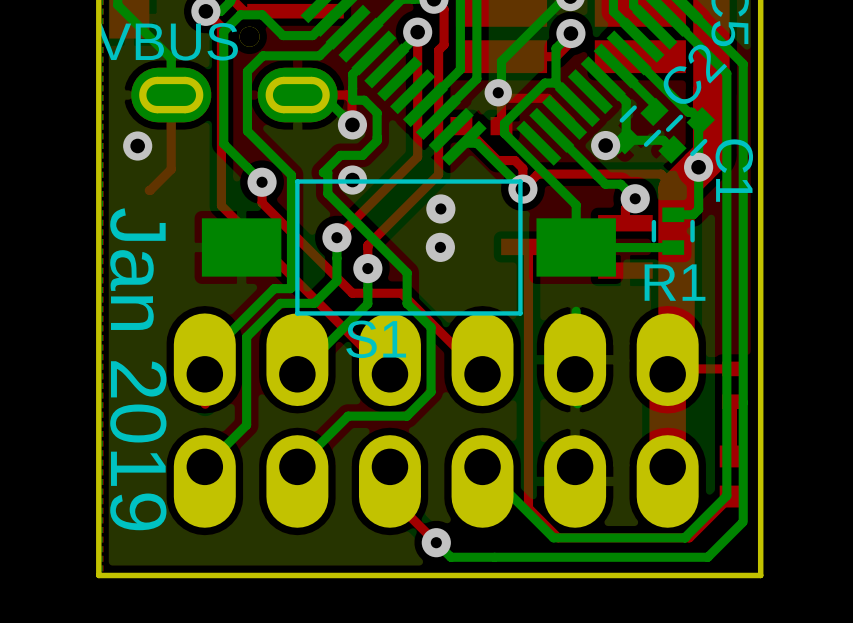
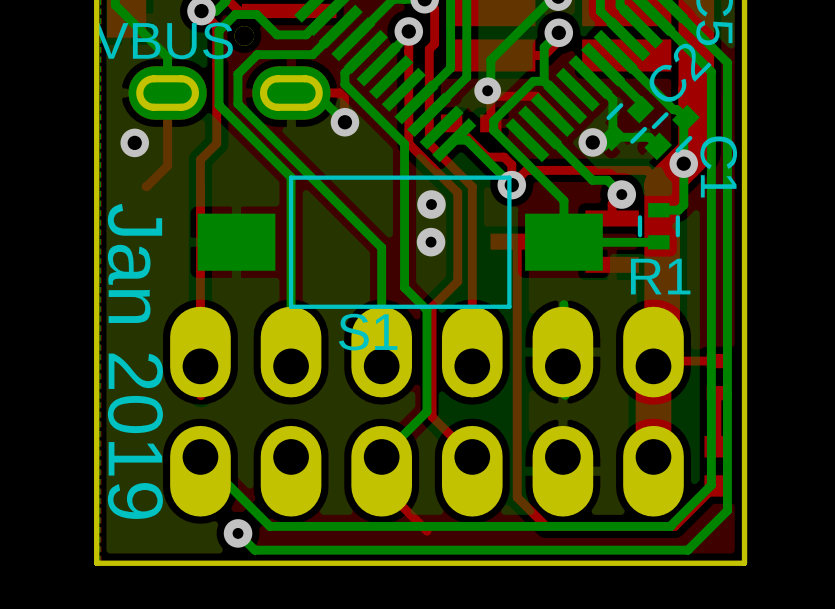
bottom track: (247, 71) (247, 131) (291, 175) (291, 287) (274, 288) (204, 358) (204, 374) -> (242, 69) (237, 74) (237, 103) (381, 247) (381, 366)
bottom track: (352, 74) (352, 100) (364, 100) (377, 113) (377, 140) (362, 155) (340, 155) (323, 172) (327, 172) (327, 193) (407, 272) (407, 303) -> (344, 72) (344, 84) (404, 144) (404, 287) (426, 310) (426, 411) (381, 456)
bottom track: (223, 107) (223, 143) (262, 182) -> (219, 105) (291, 177) (291, 366)
top track: (221, 146) (221, 205) (389, 374) -> (216, 143) (200, 159) (200, 366)
top track: (417, 146) (417, 156) (336, 237) -> (408, 143) (457, 192) (457, 281) (432, 307) (432, 416) (472, 456)
top track: (438, 146) (438, 174) (367, 245) (367, 268) -> (429, 143) (472, 186) (472, 366)
via: (352, 180) -> none
top track: (262, 182) (262, 202) (352, 293) (401, 293) (482, 374) -> none
via: (262, 182) -> none
bottom track: (336, 237) (336, 280) (314, 303) (280, 303) (246, 337) (246, 425) (204, 466) -> none
via: (336, 237) -> none
bottom track: (367, 268) (367, 303) (297, 374) -> none
via: (367, 268) -> none
bottom track: (406, 303) (431, 327) (431, 392) (406, 416) (348, 416) (297, 466) -> none
bottom track: (482, 466) (553, 537) -> (200, 456) (269, 526) (541, 526)
bottom track: (436, 542) (450, 557) (707, 557) -> (238, 533) (254, 550) (687, 550) (692, 545)
via: (436, 542) -> none
via: none -> (238, 533)

